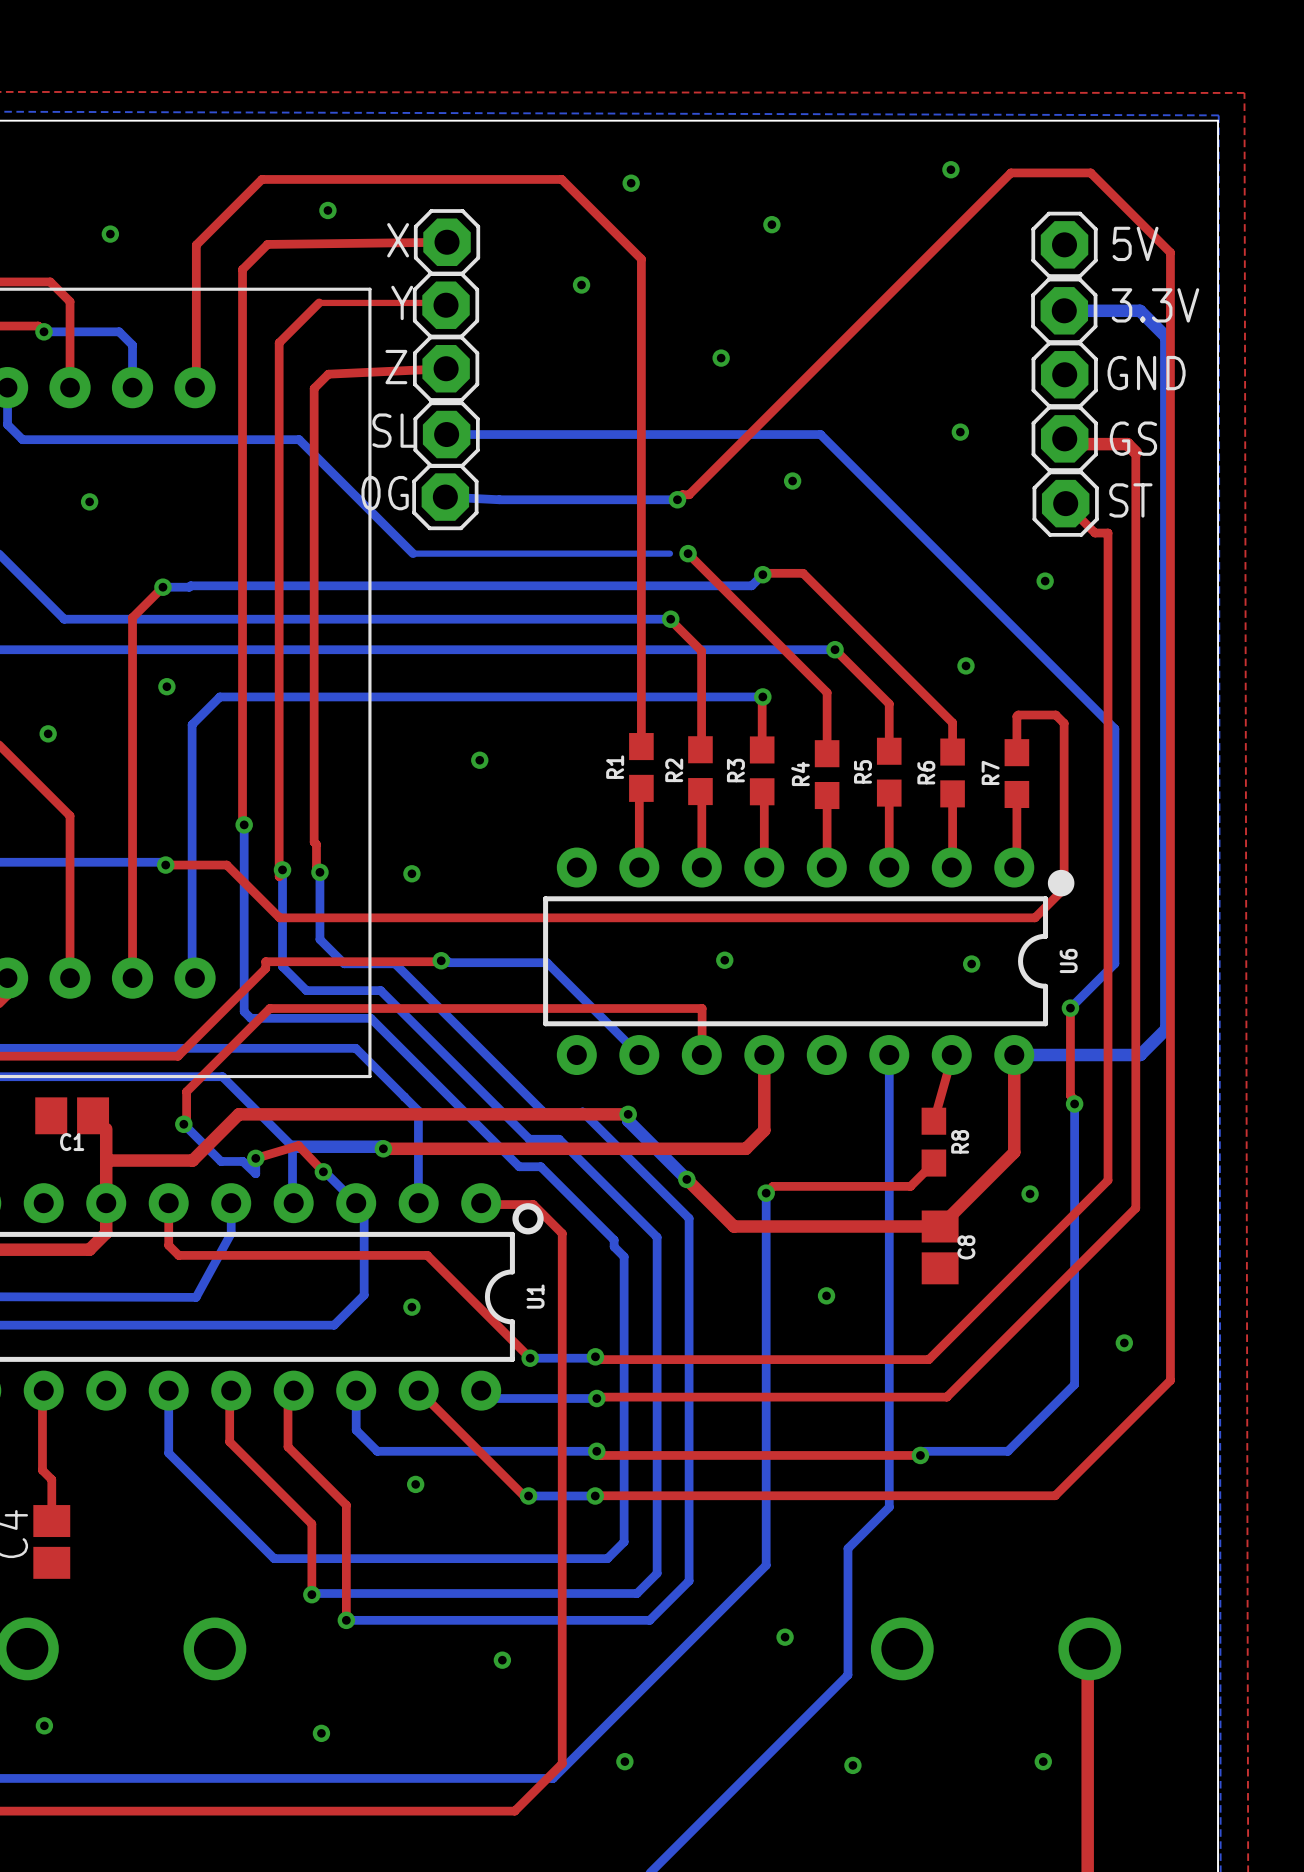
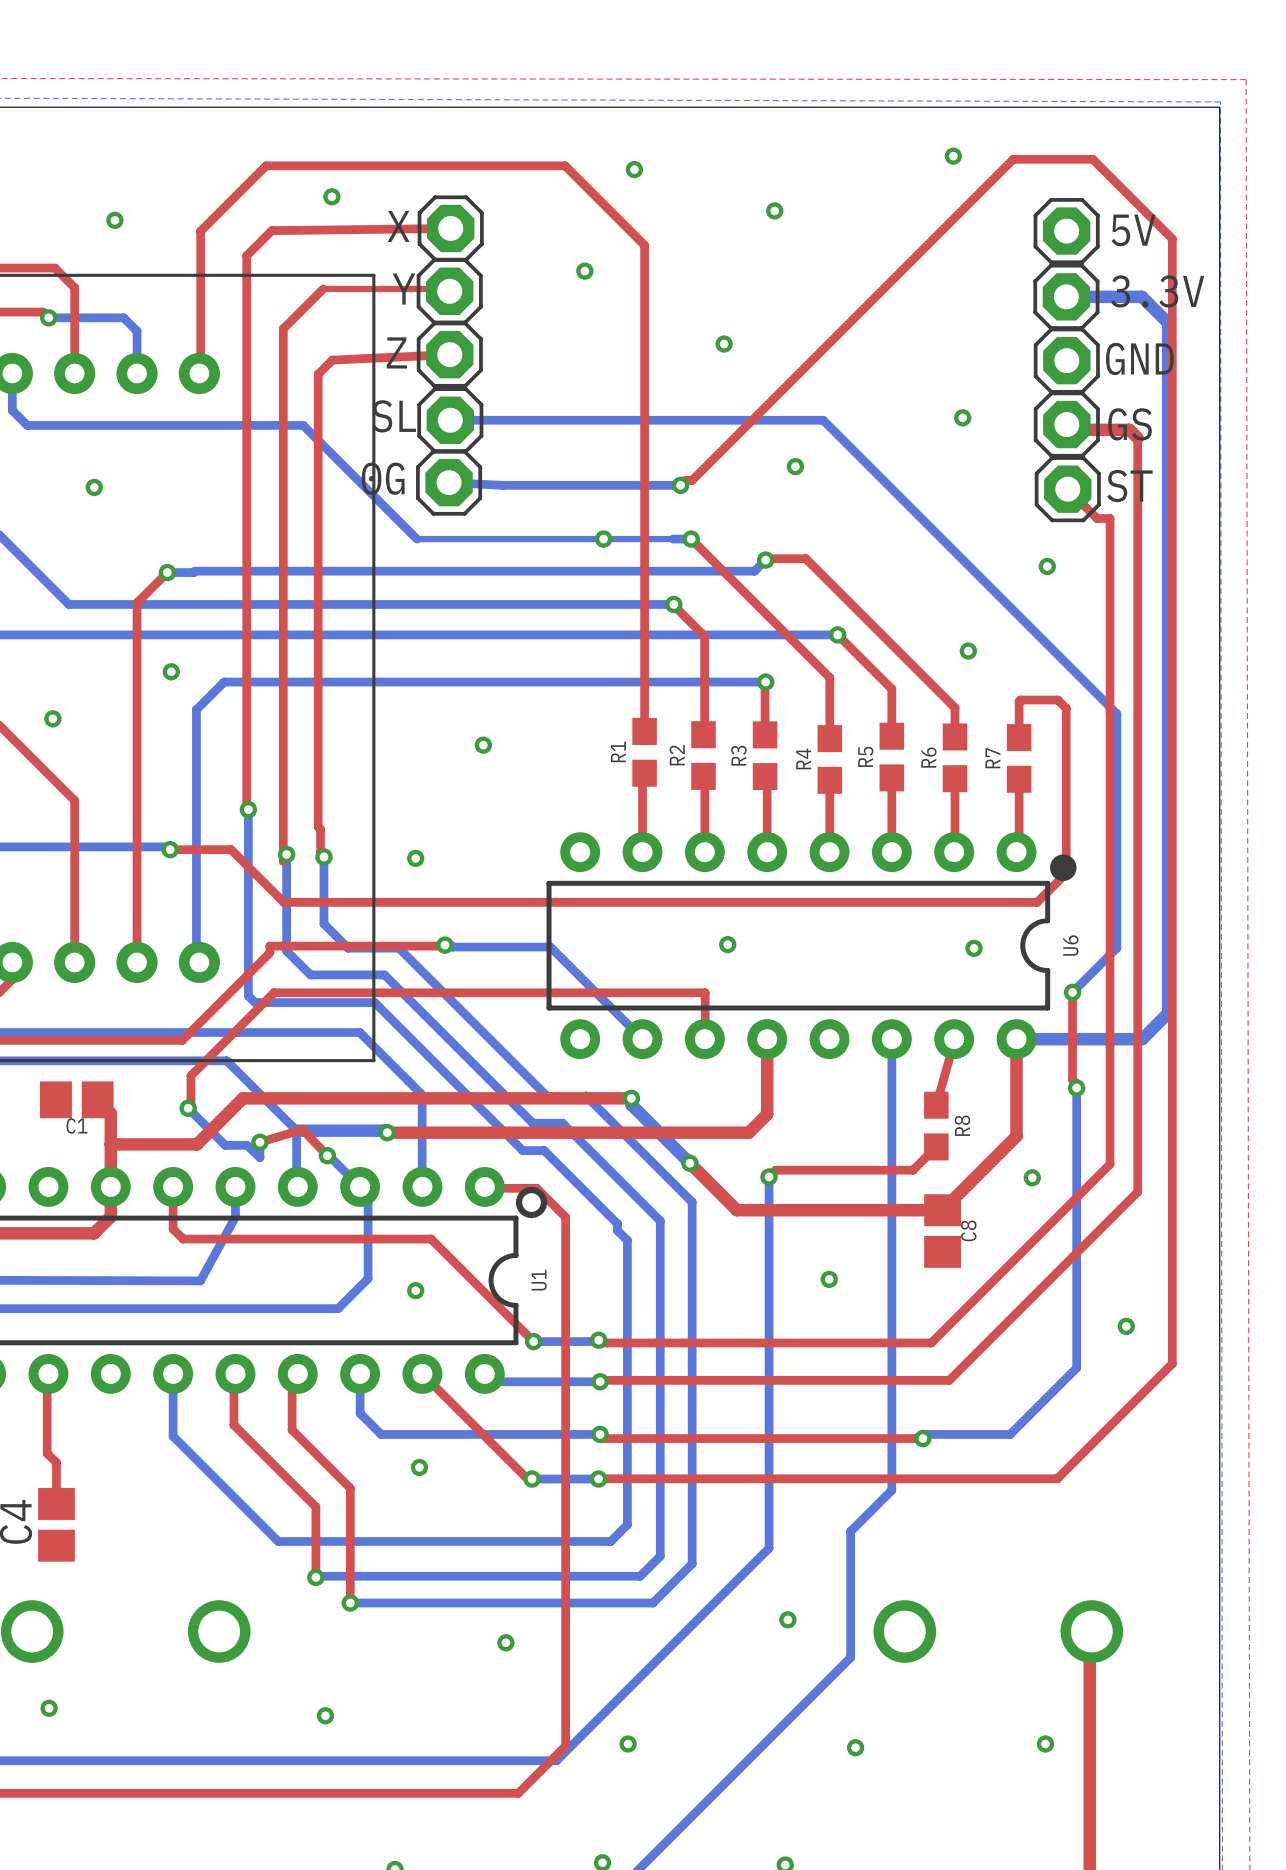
via: none -> (603, 539)
bottom track: none -> (673, 539) (688, 539)

